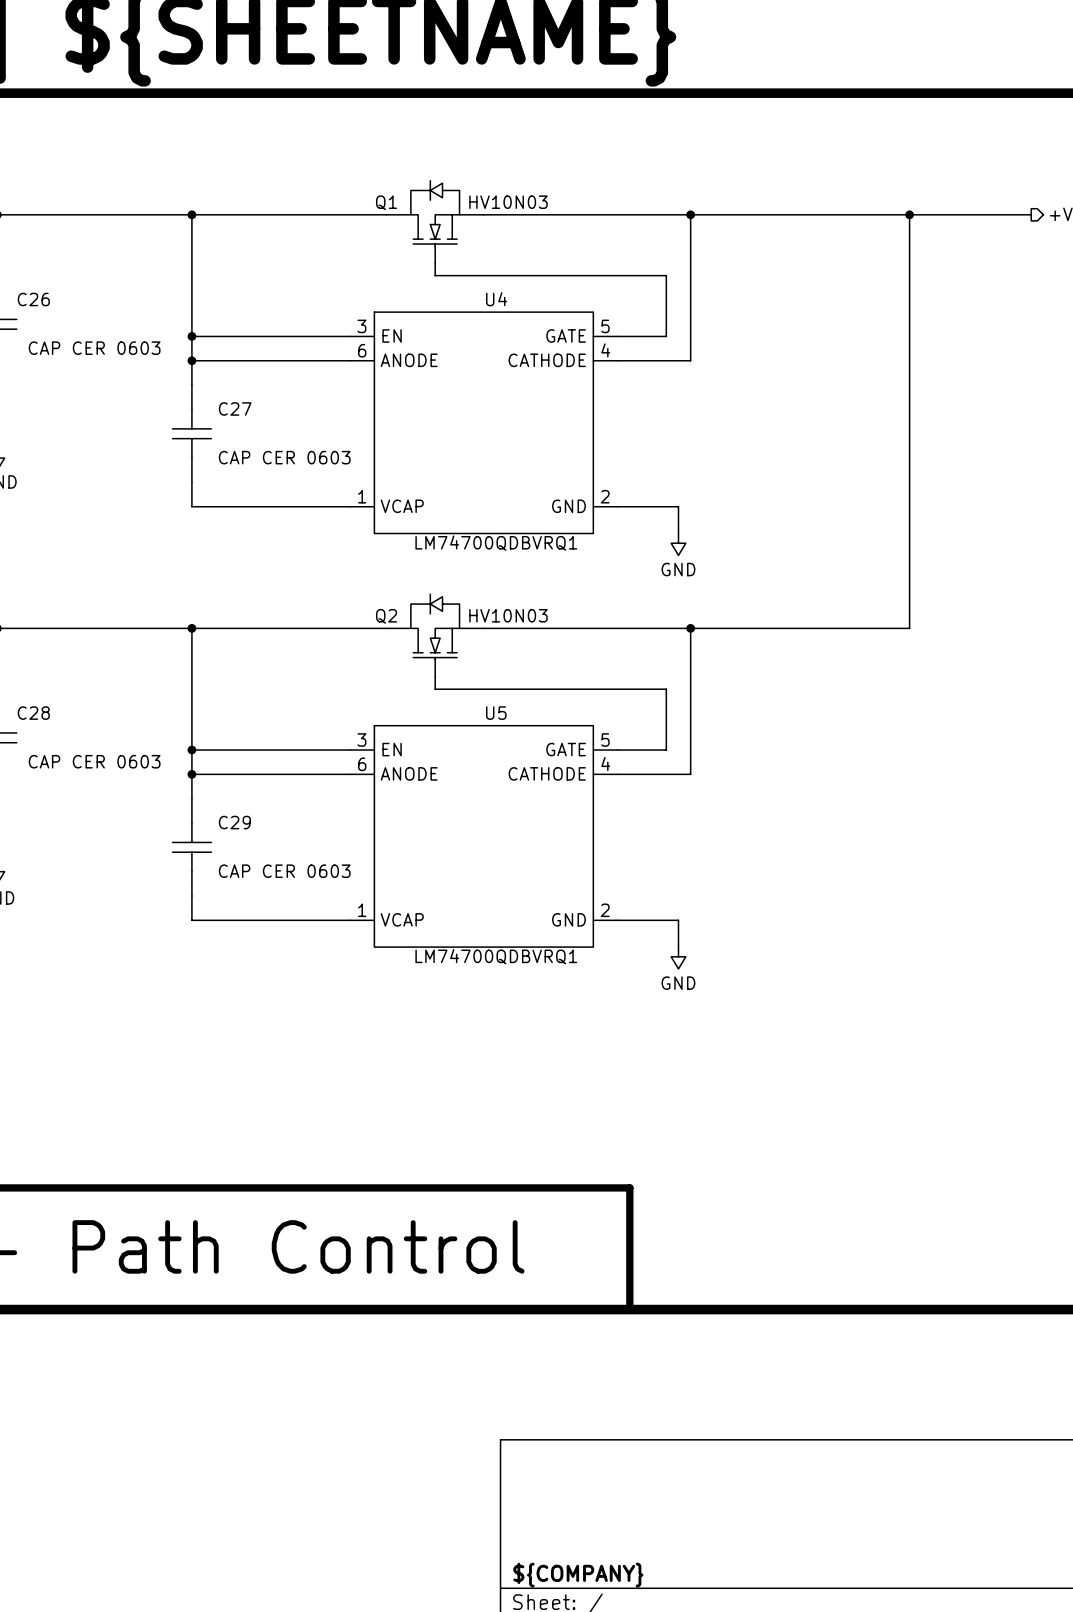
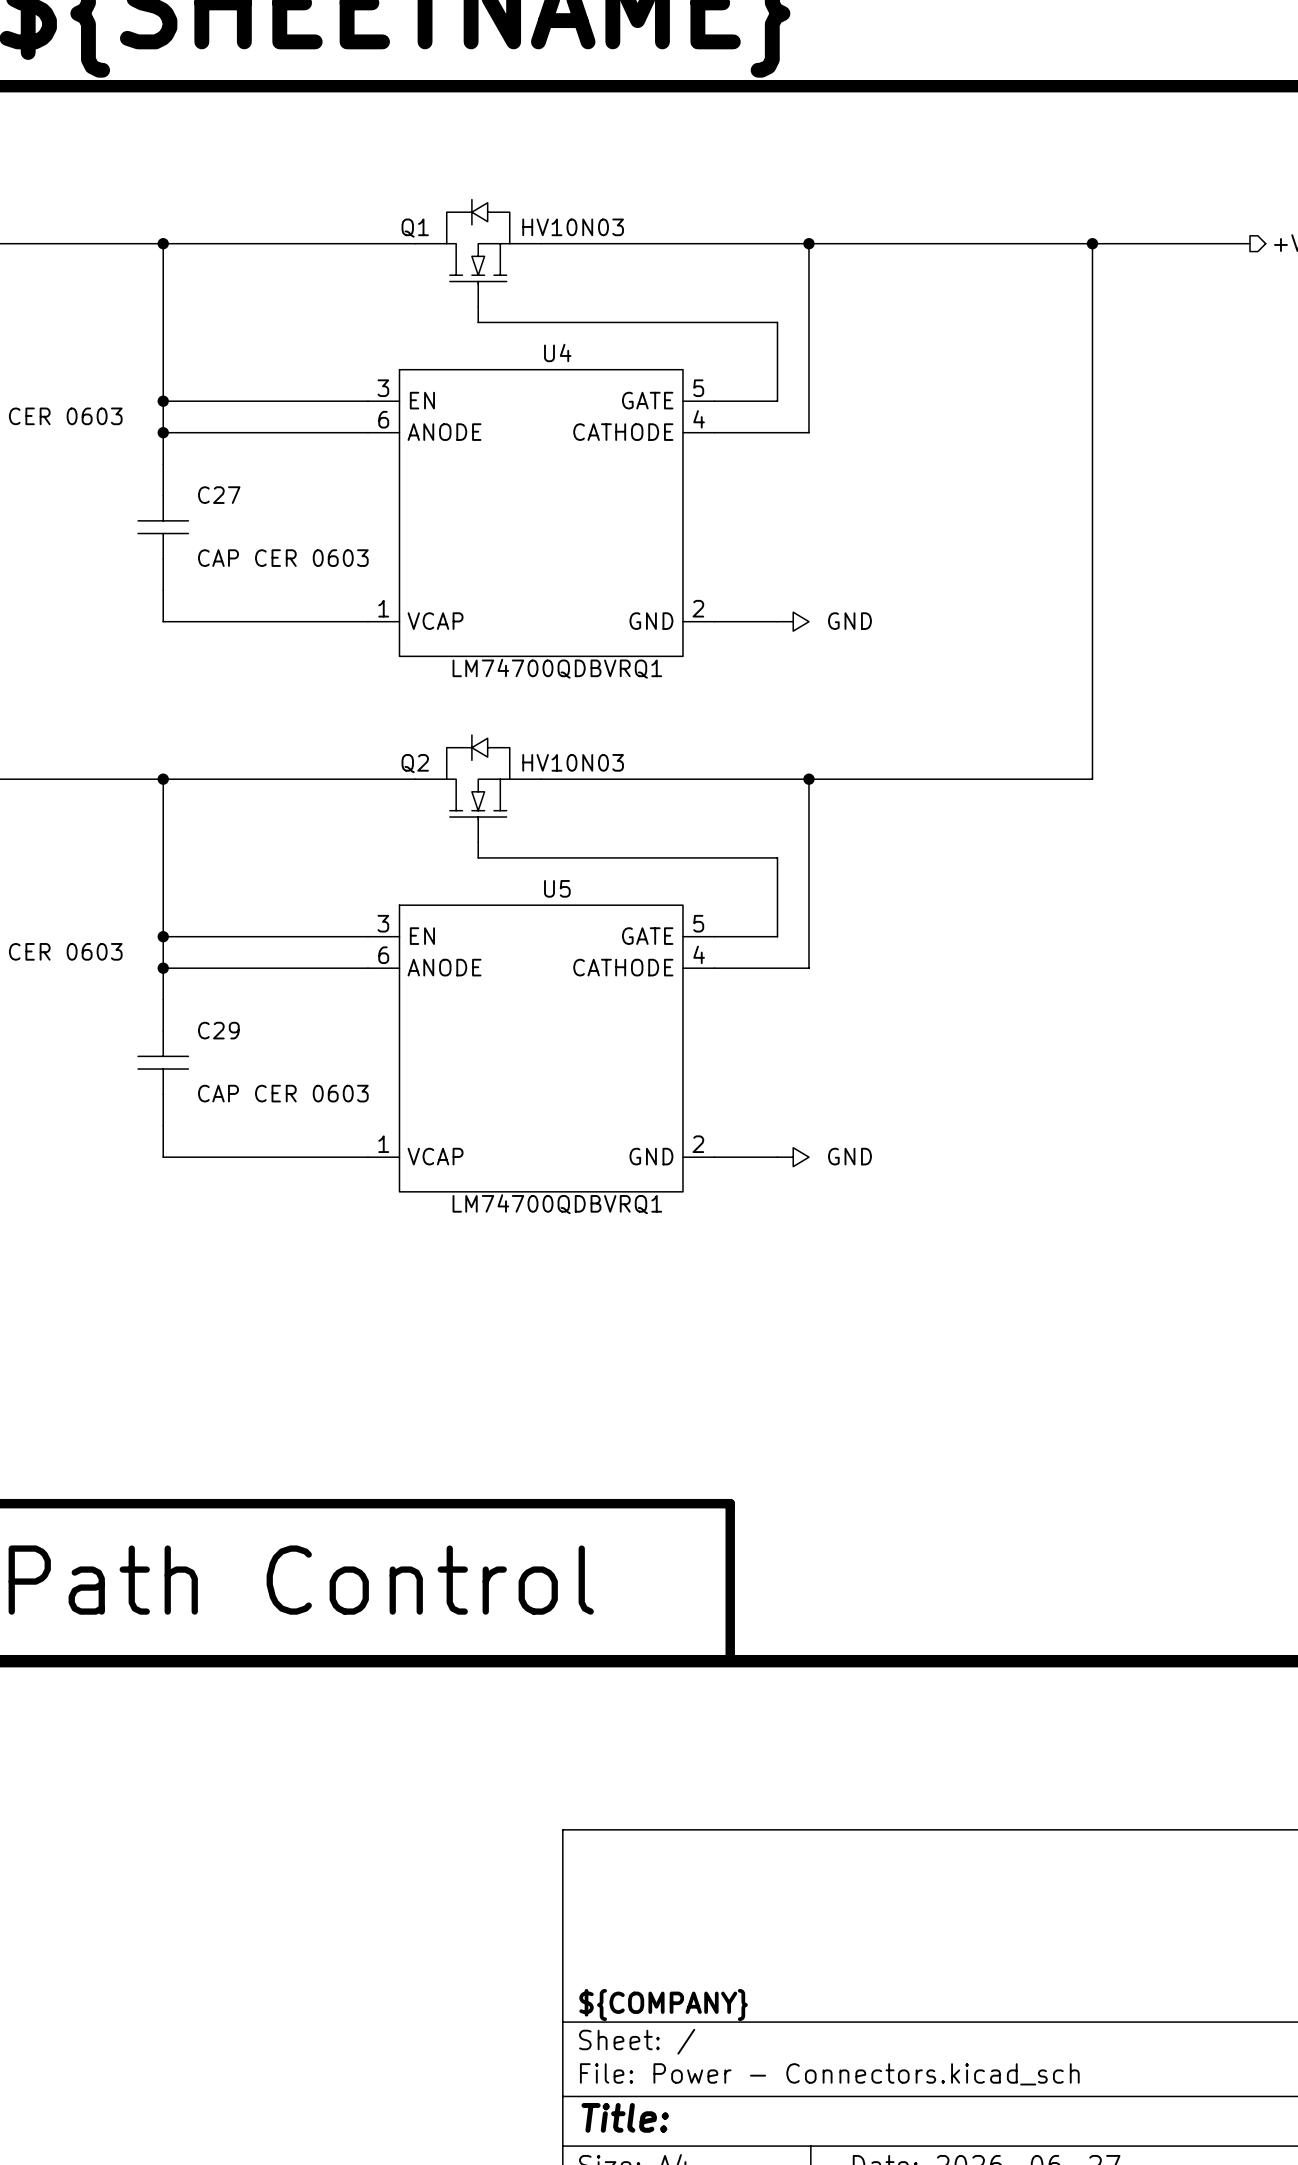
wire: (666, 506) (678, 506) (678, 531) -> none
power symbol rotation: 0° (678, 543) -> 90° counterclockwise (793, 621)
power symbol position: GND (678, 543) -> GND (793, 621)
power symbol text position: GND (678, 569) -> GND (849, 621)
wire: (666, 920) (678, 920) (678, 944) -> none
power symbol rotation: 0° (678, 956) -> 90° counterclockwise (793, 1157)
power symbol position: GND (678, 956) -> GND (793, 1157)
power symbol text position: GND (678, 983) -> GND (849, 1156)

